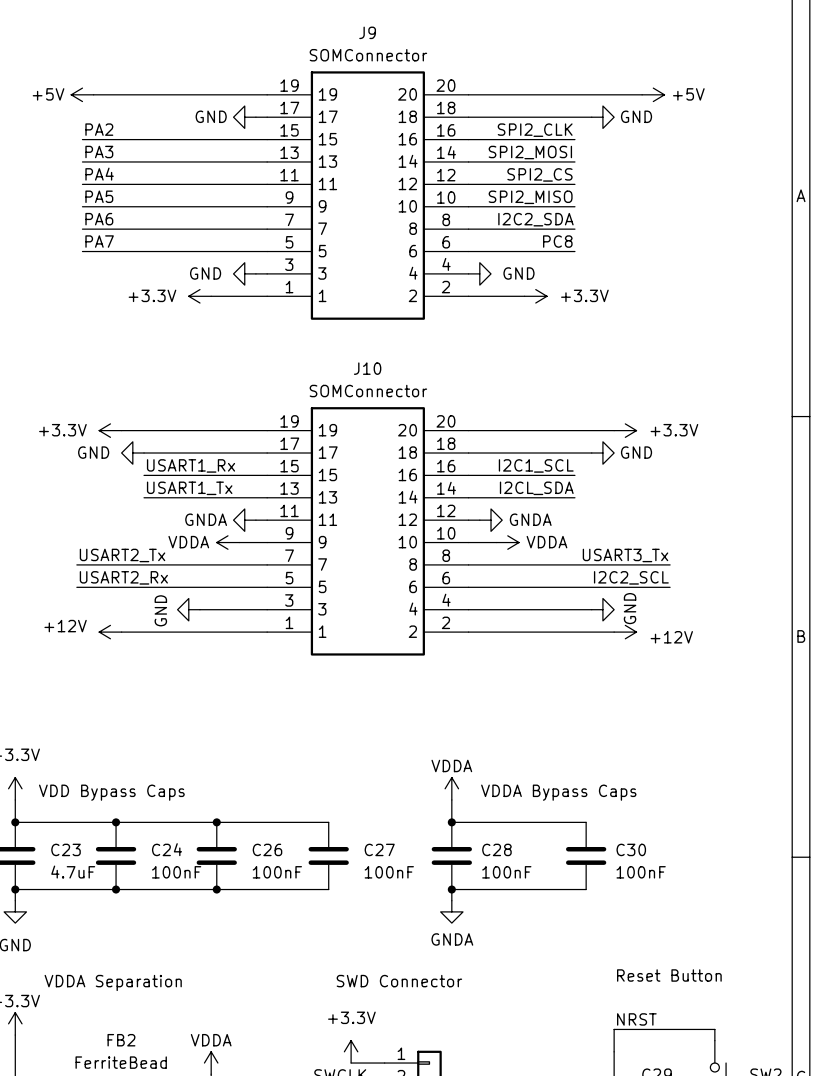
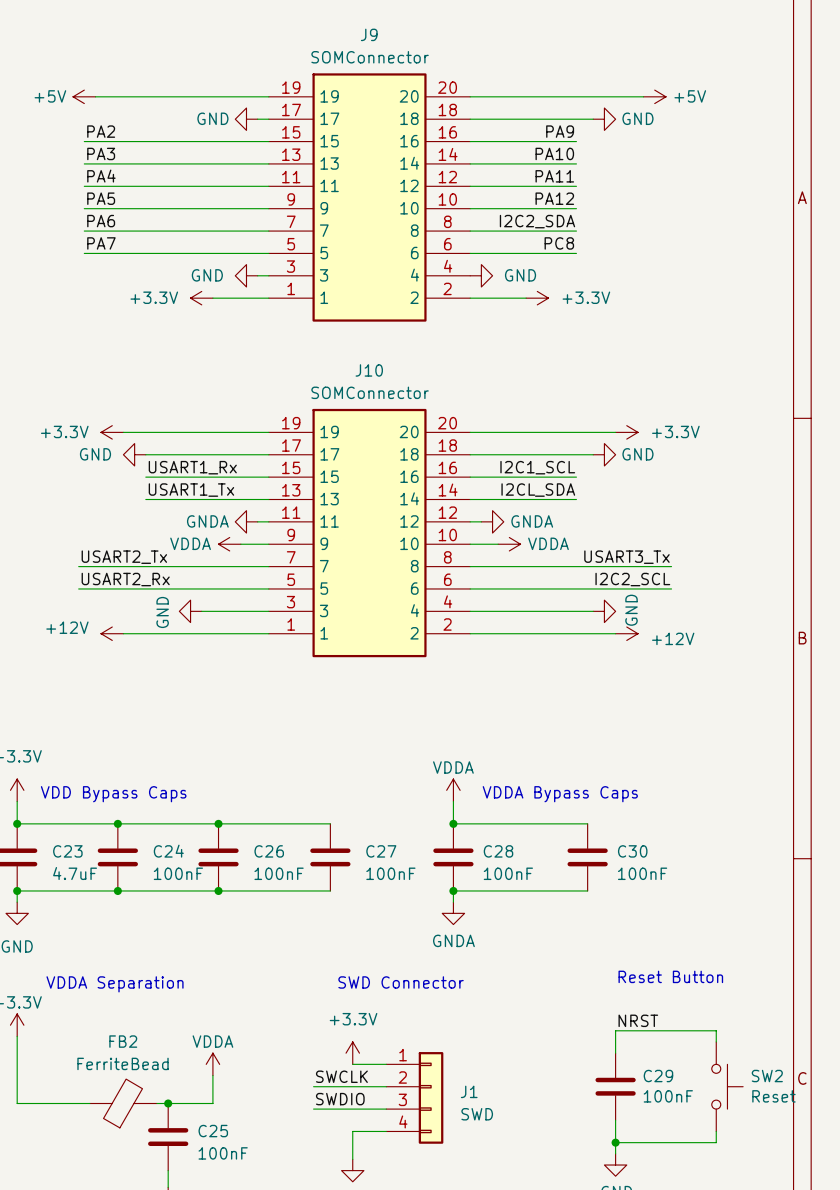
label: SPI2_CLK (535, 130) -> PA9 (560, 131)
label: SPI2_MOSI (530, 152) -> PA10 (554, 153)
label: SPI2_CS (539, 174) -> PA11 (554, 176)
label: SPI2_MISO (530, 197) -> PA12 (554, 198)

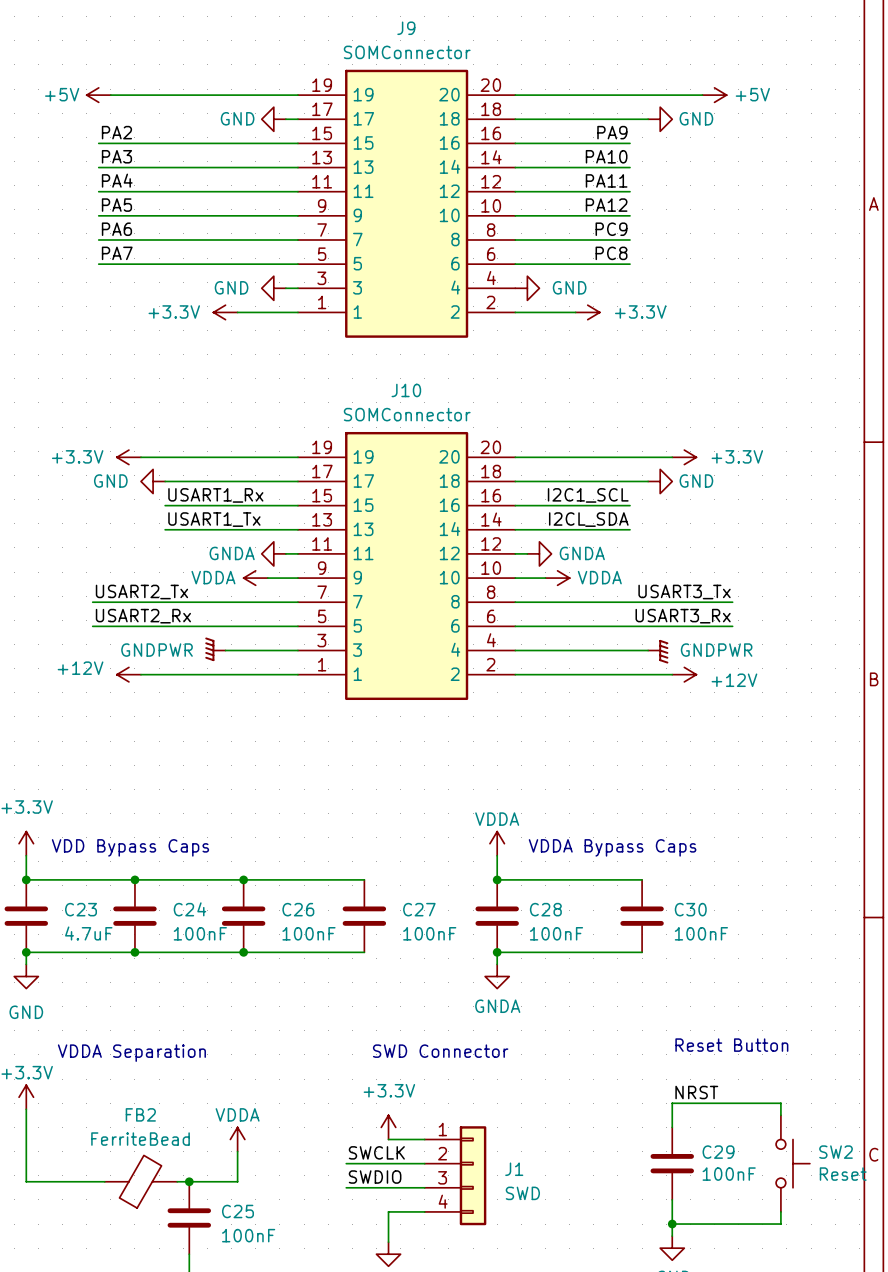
label: I2C2_SDA (537, 221) -> PC9 (611, 229)
label: I2C2_SCL (632, 579) -> USART3_Rx (683, 616)
power symbol: GND (190, 611) -> GNDPWR (215, 649)
power symbol: GND (604, 611) -> GNDPWR (658, 651)

